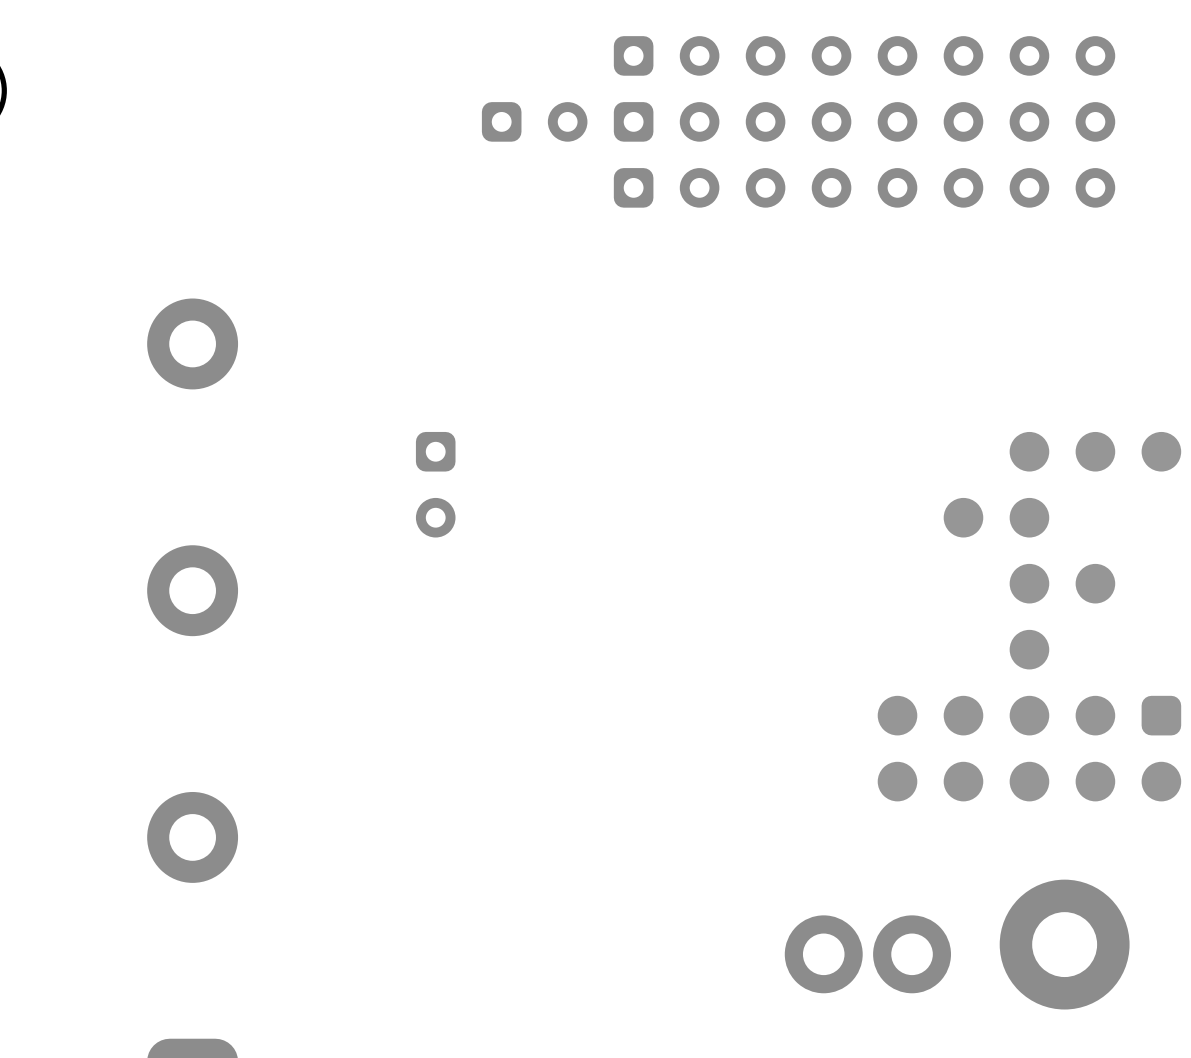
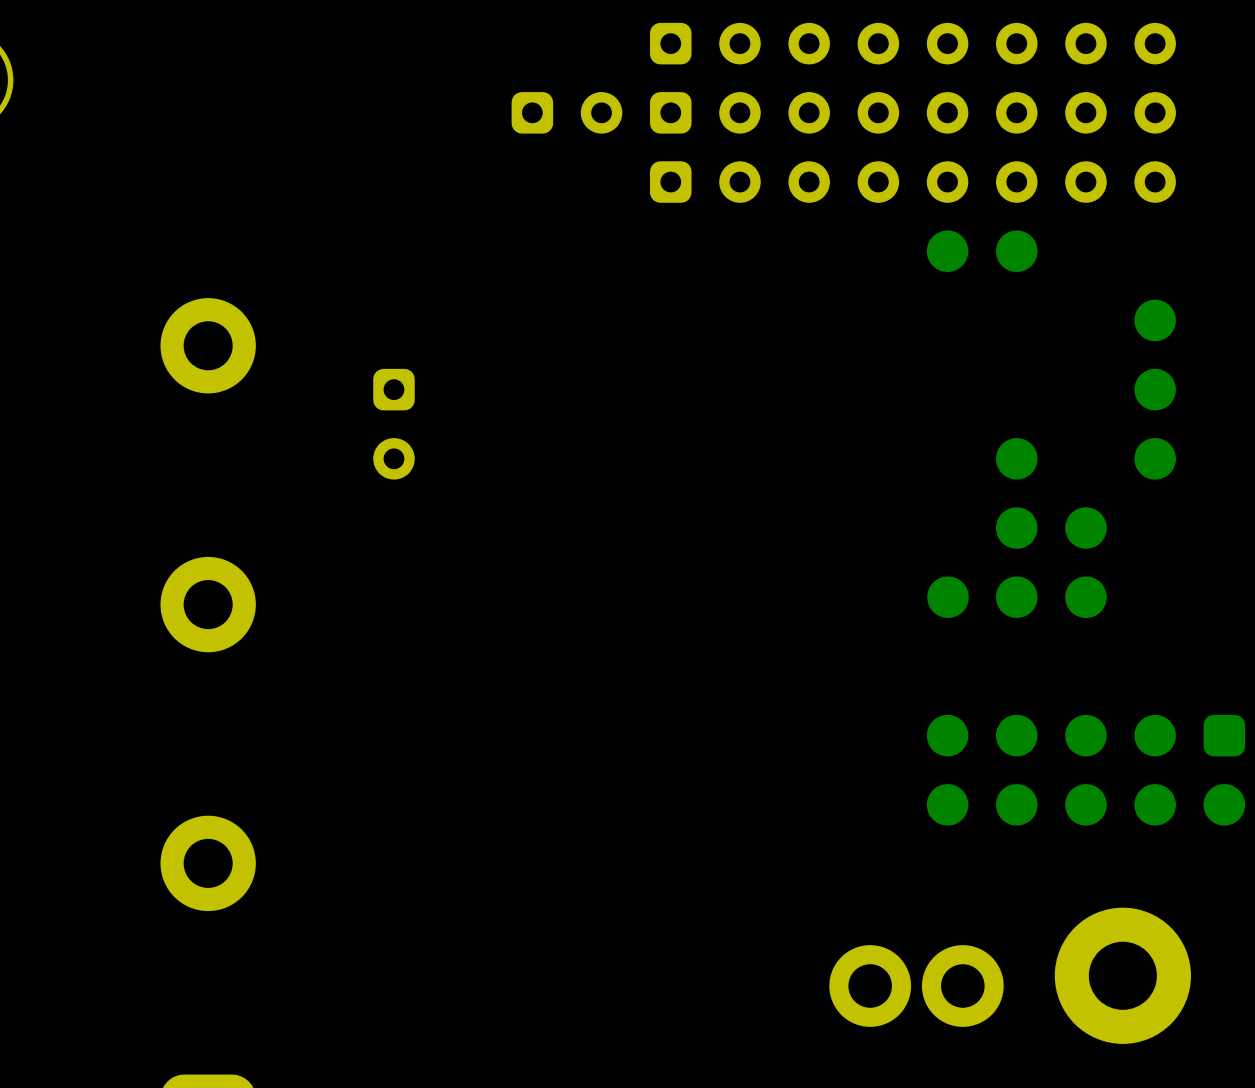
part: none -> (947, 251)
part: none -> (1016, 251)
part: none -> (1155, 320)
part: none -> (1155, 389)
part: none -> (1016, 458)
part: (1029, 451) -> none
part: (1161, 451) -> none
part position: (435, 484) -> (393, 424)
part: none -> (948, 597)
part: none -> (1016, 597)
part: (1095, 583) -> none
part: (1029, 649) -> none

